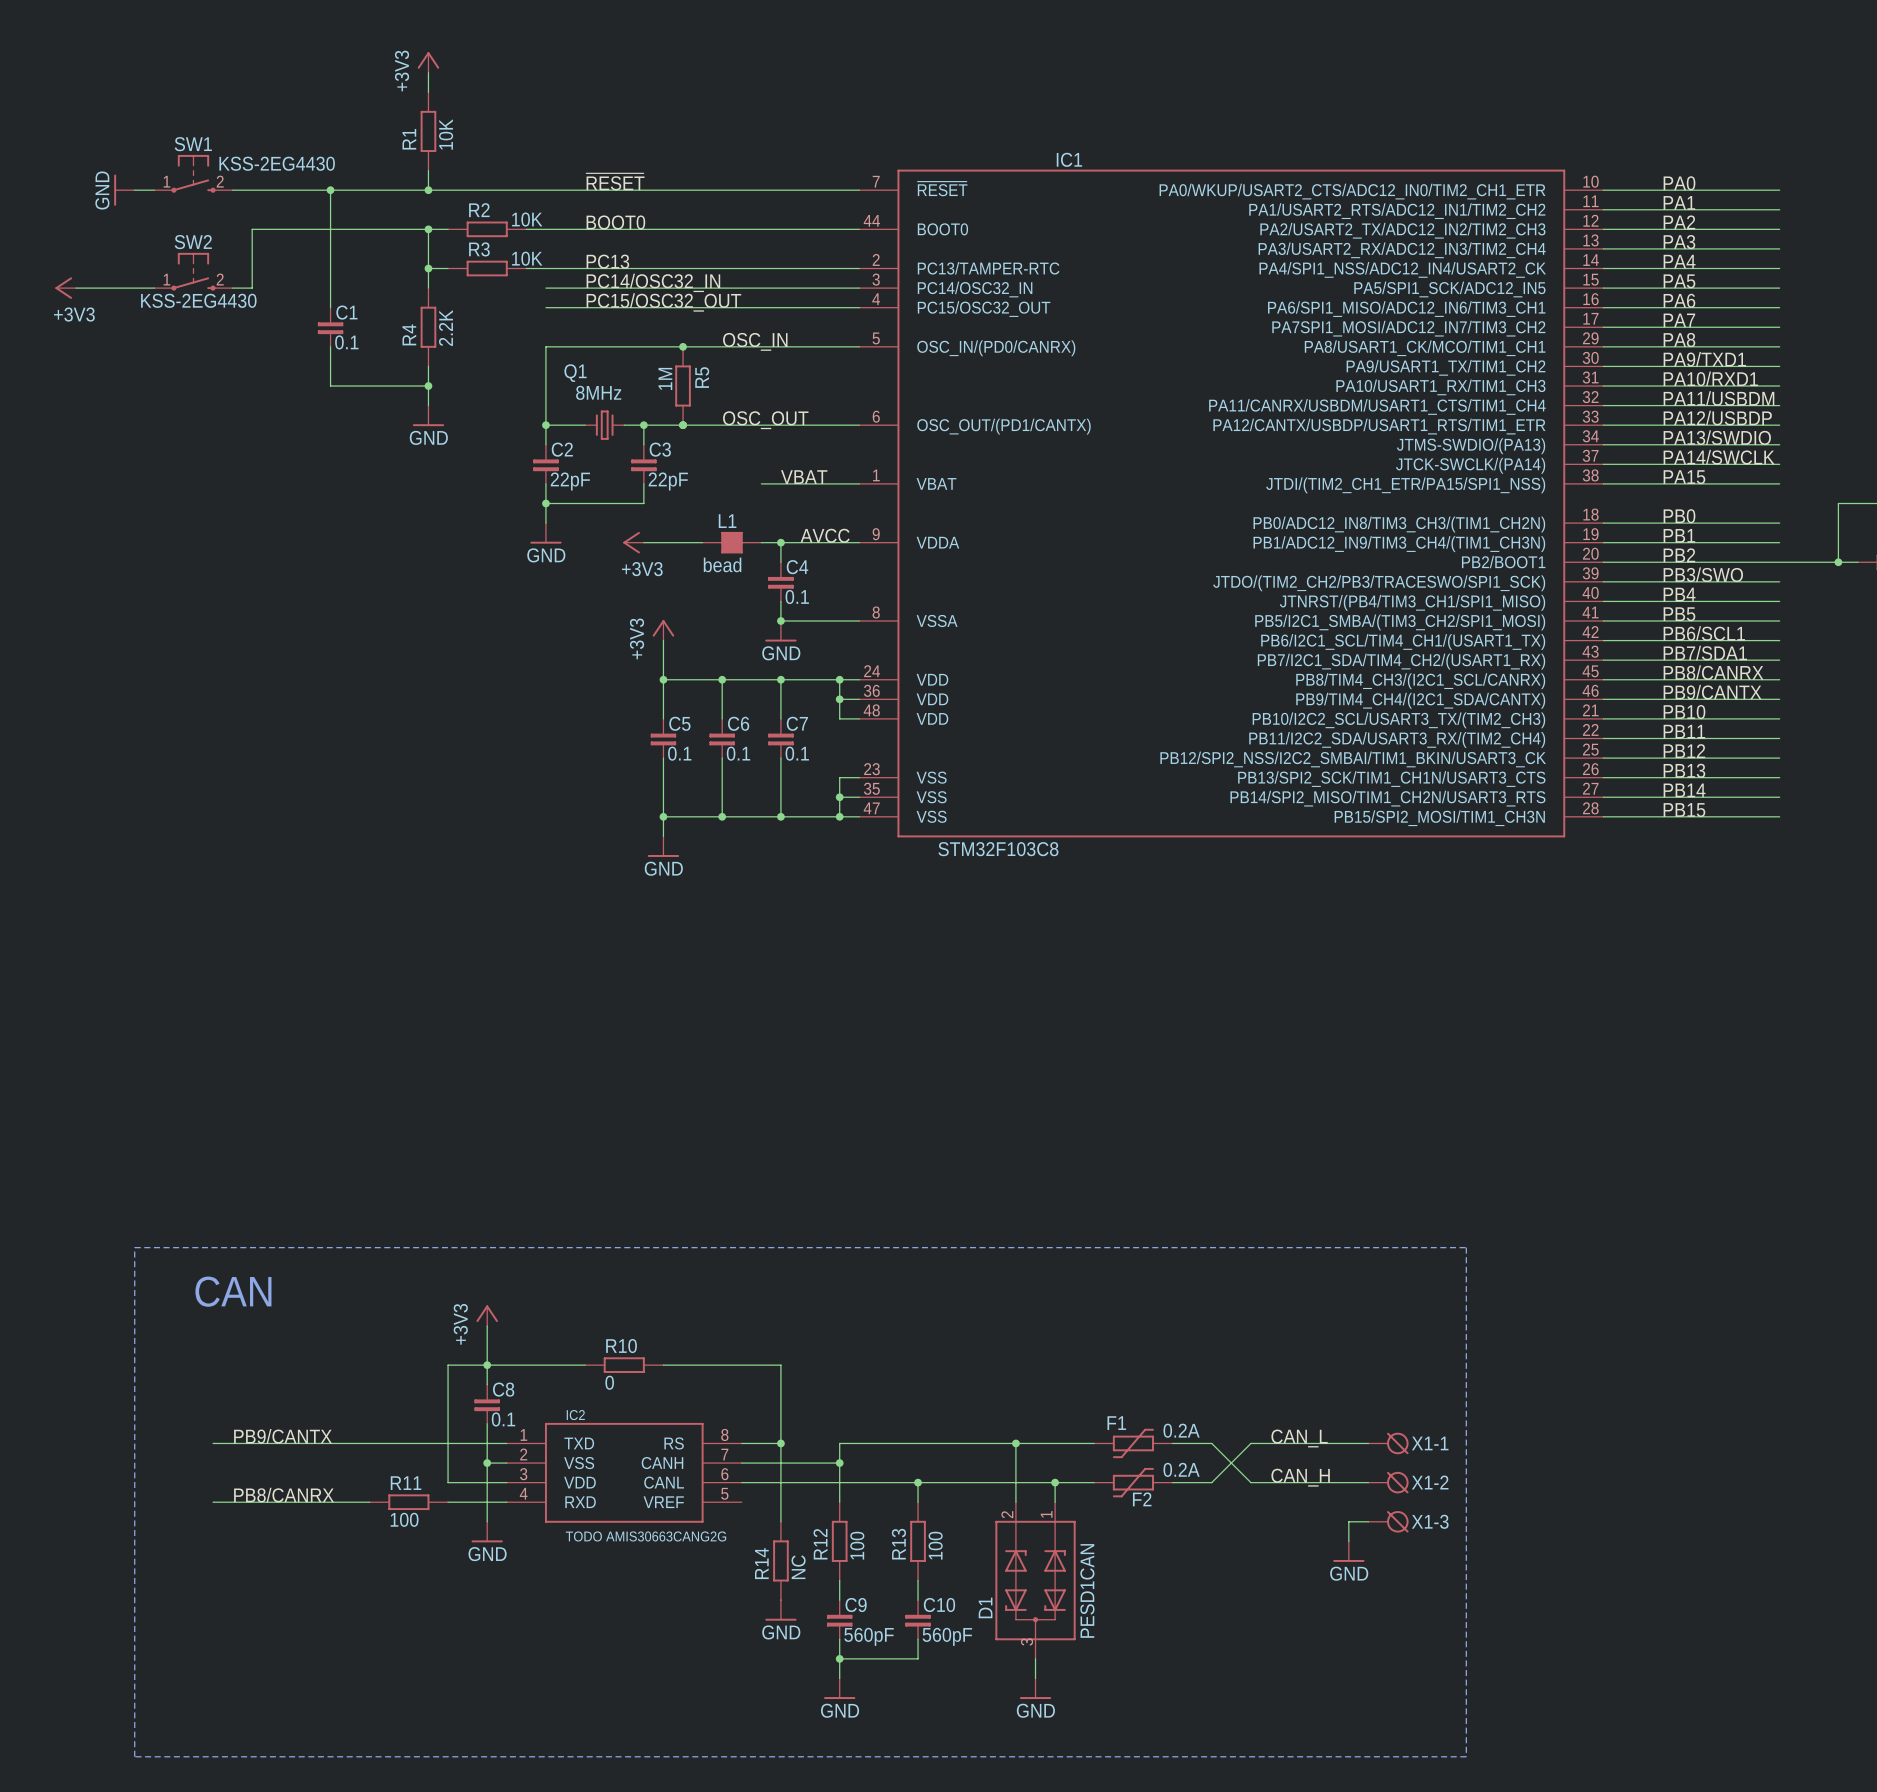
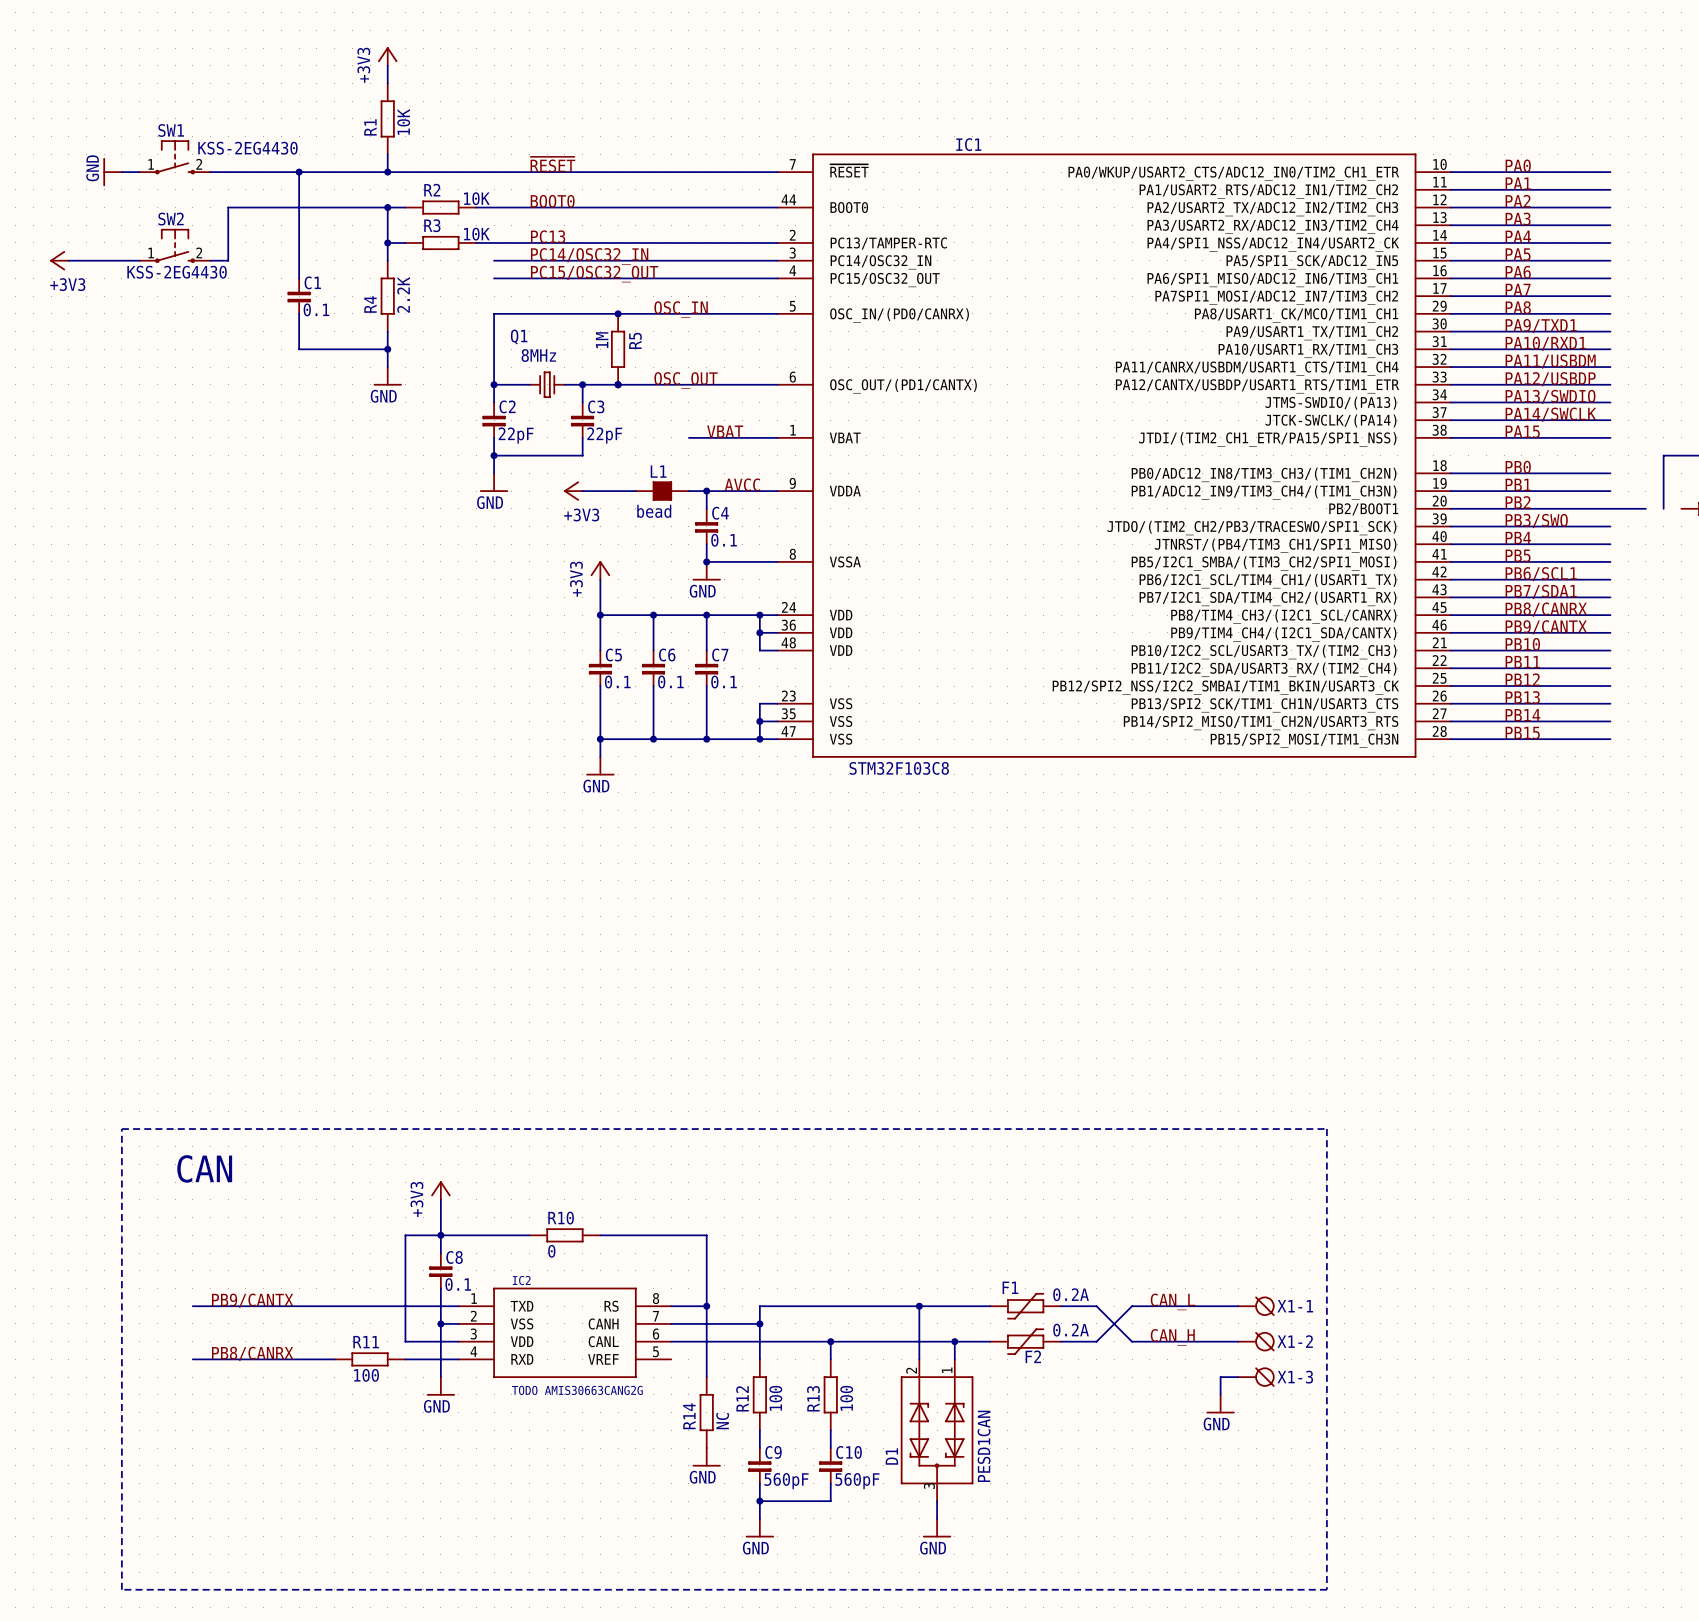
wire: (1818, 562) (1857, 562) -> none
junction: (1838, 562) -> none

